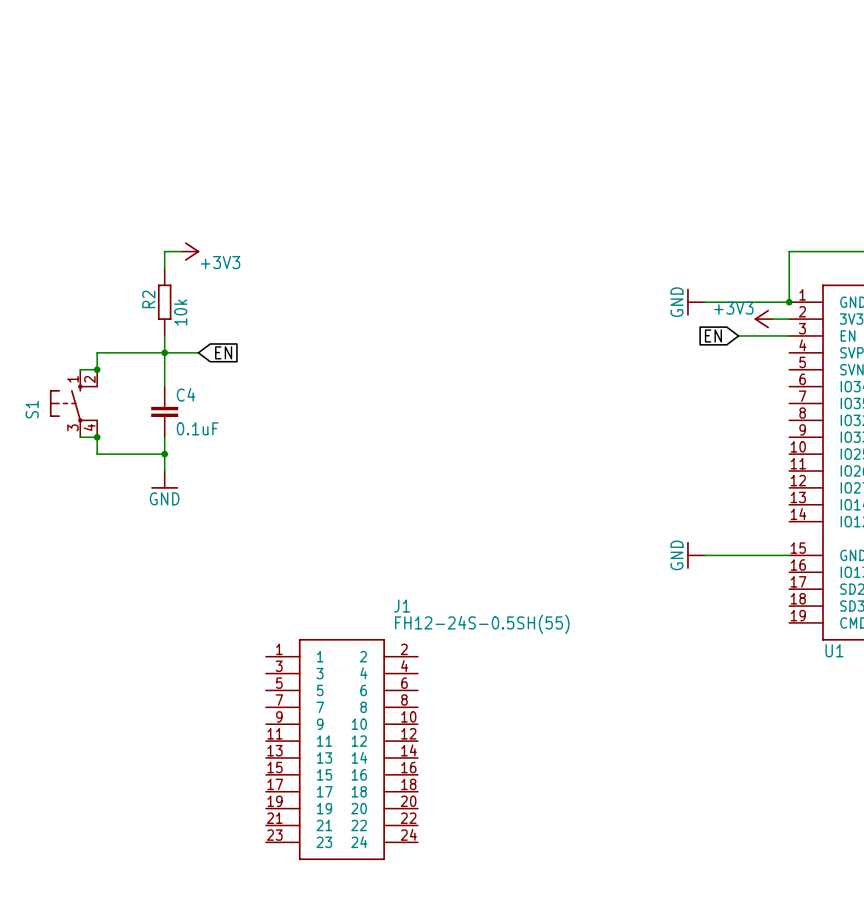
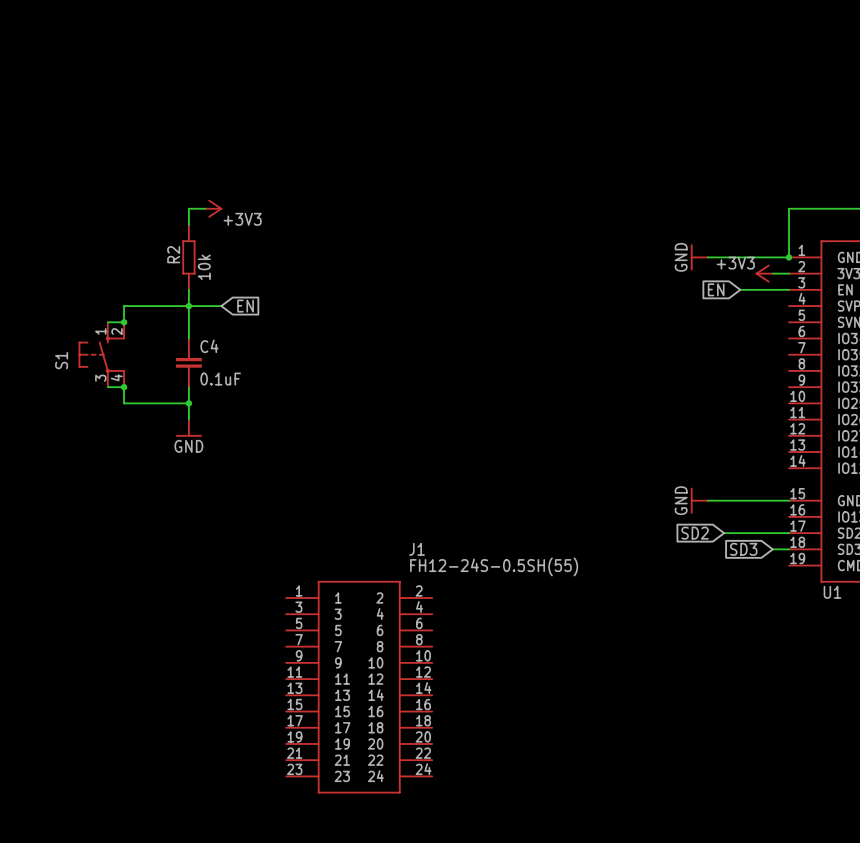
global label: none -> SD2 (695, 533)
wire: none -> (724, 533) (789, 533)
global label: none -> SD3 (743, 549)
wire: none -> (772, 549) (789, 549)

